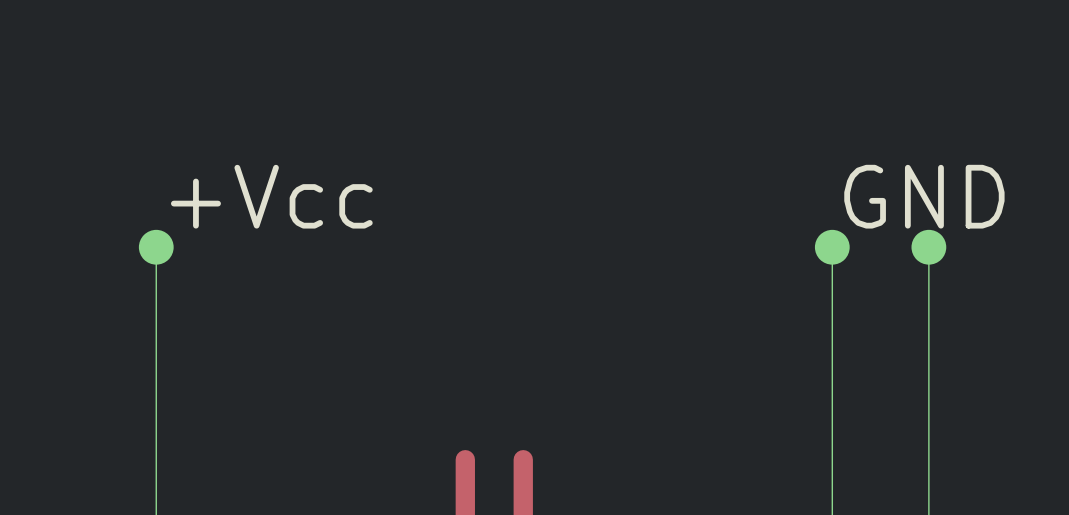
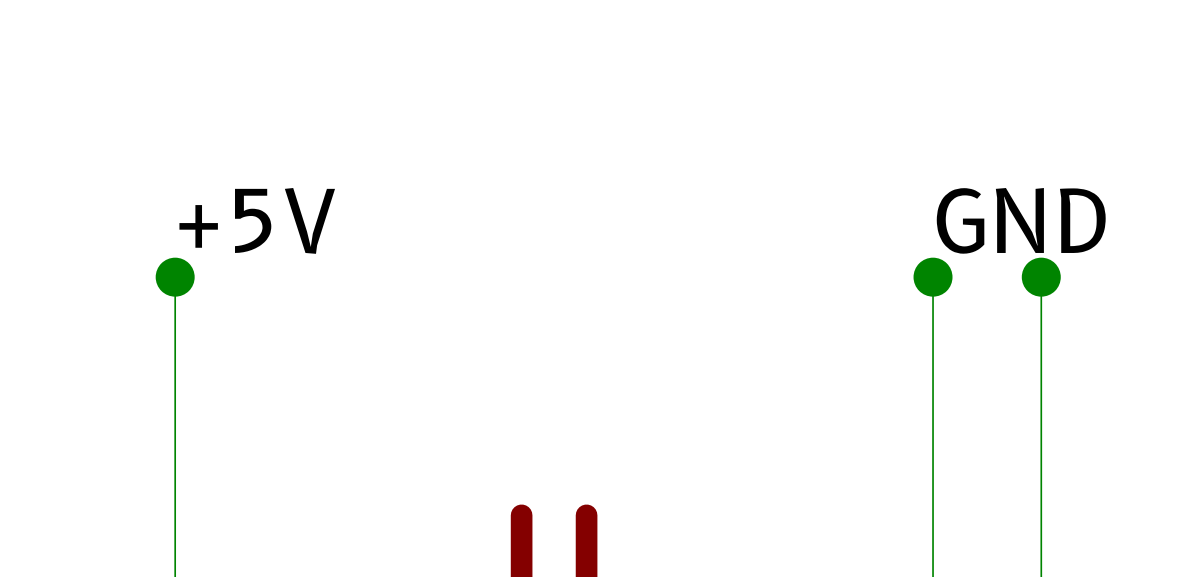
label: +Vcc (271, 196) -> +5V (257, 220)

